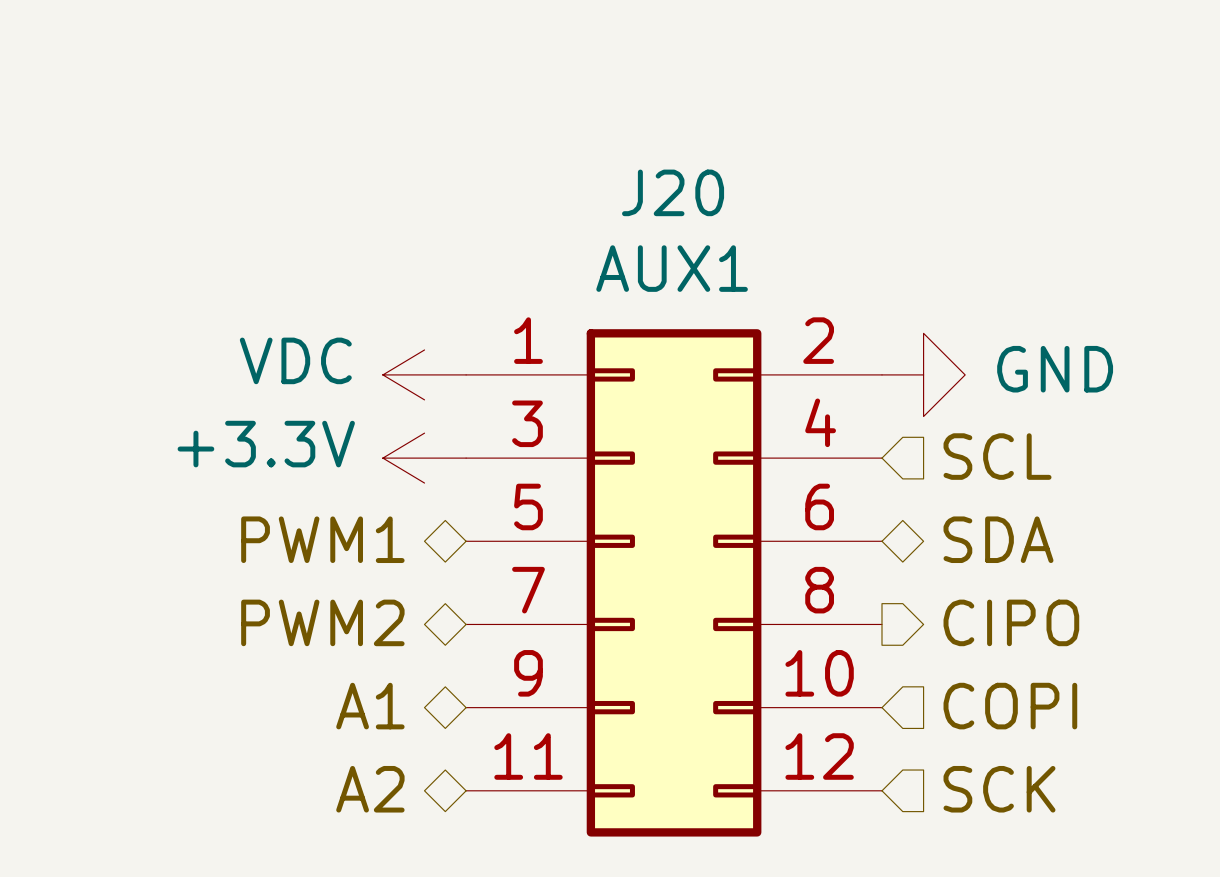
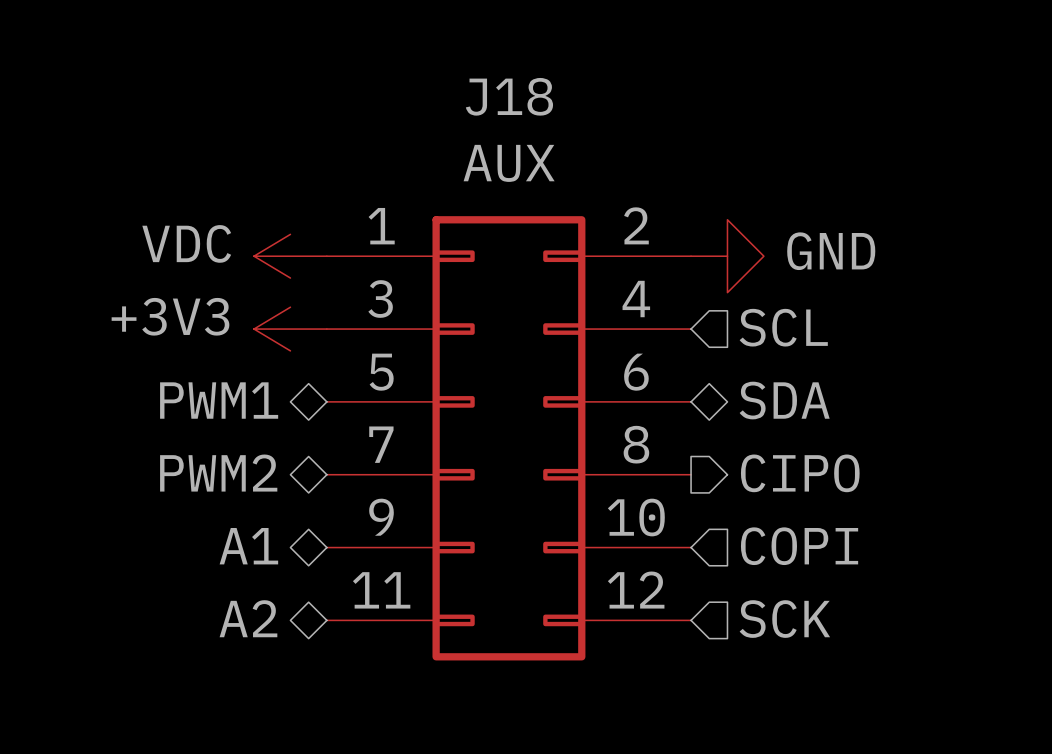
J20 name: J20 (673, 192) -> J18 (509, 96)
J20 value: AUX1 (672, 268) -> AUX (509, 163)
power symbol: +3.3V (424, 458) -> +3V3 (290, 329)

